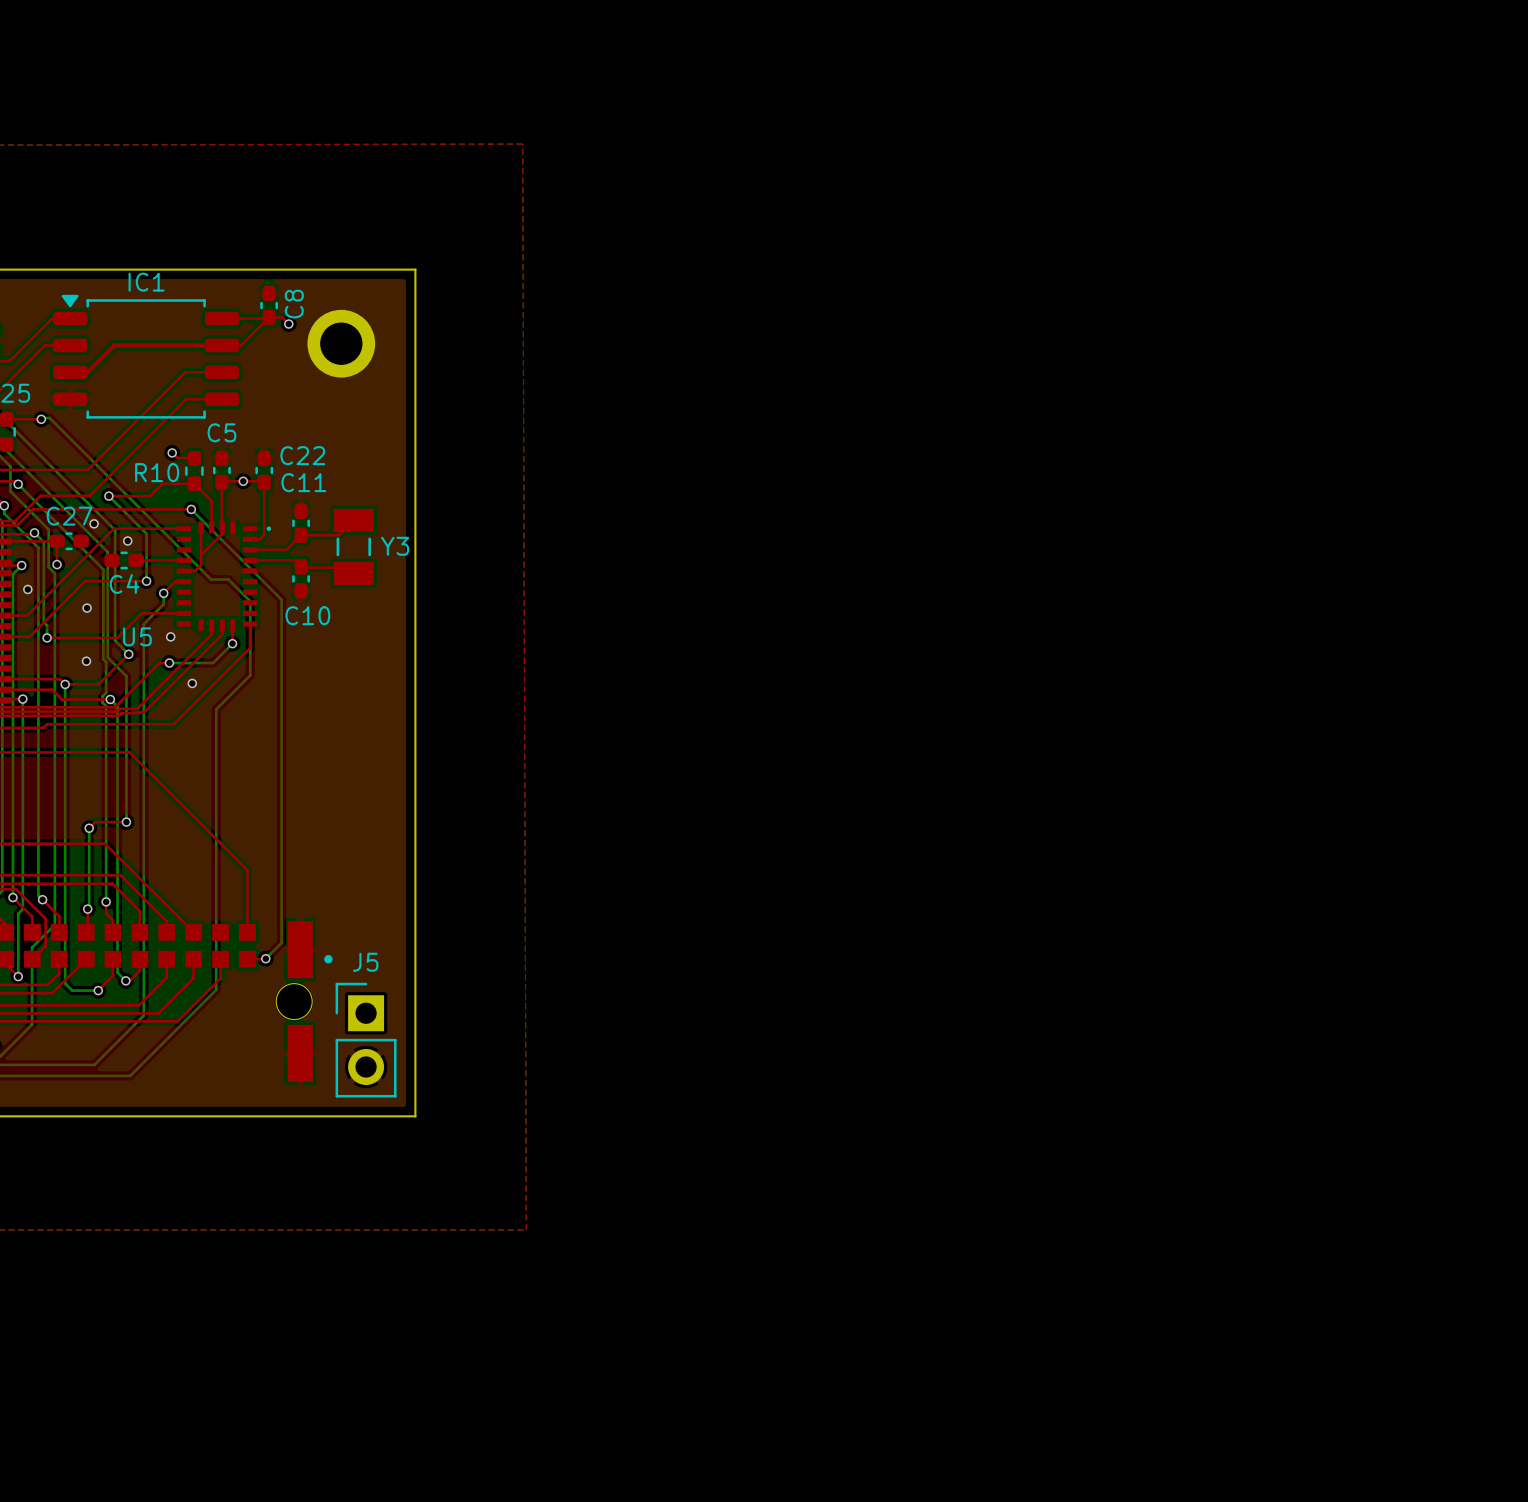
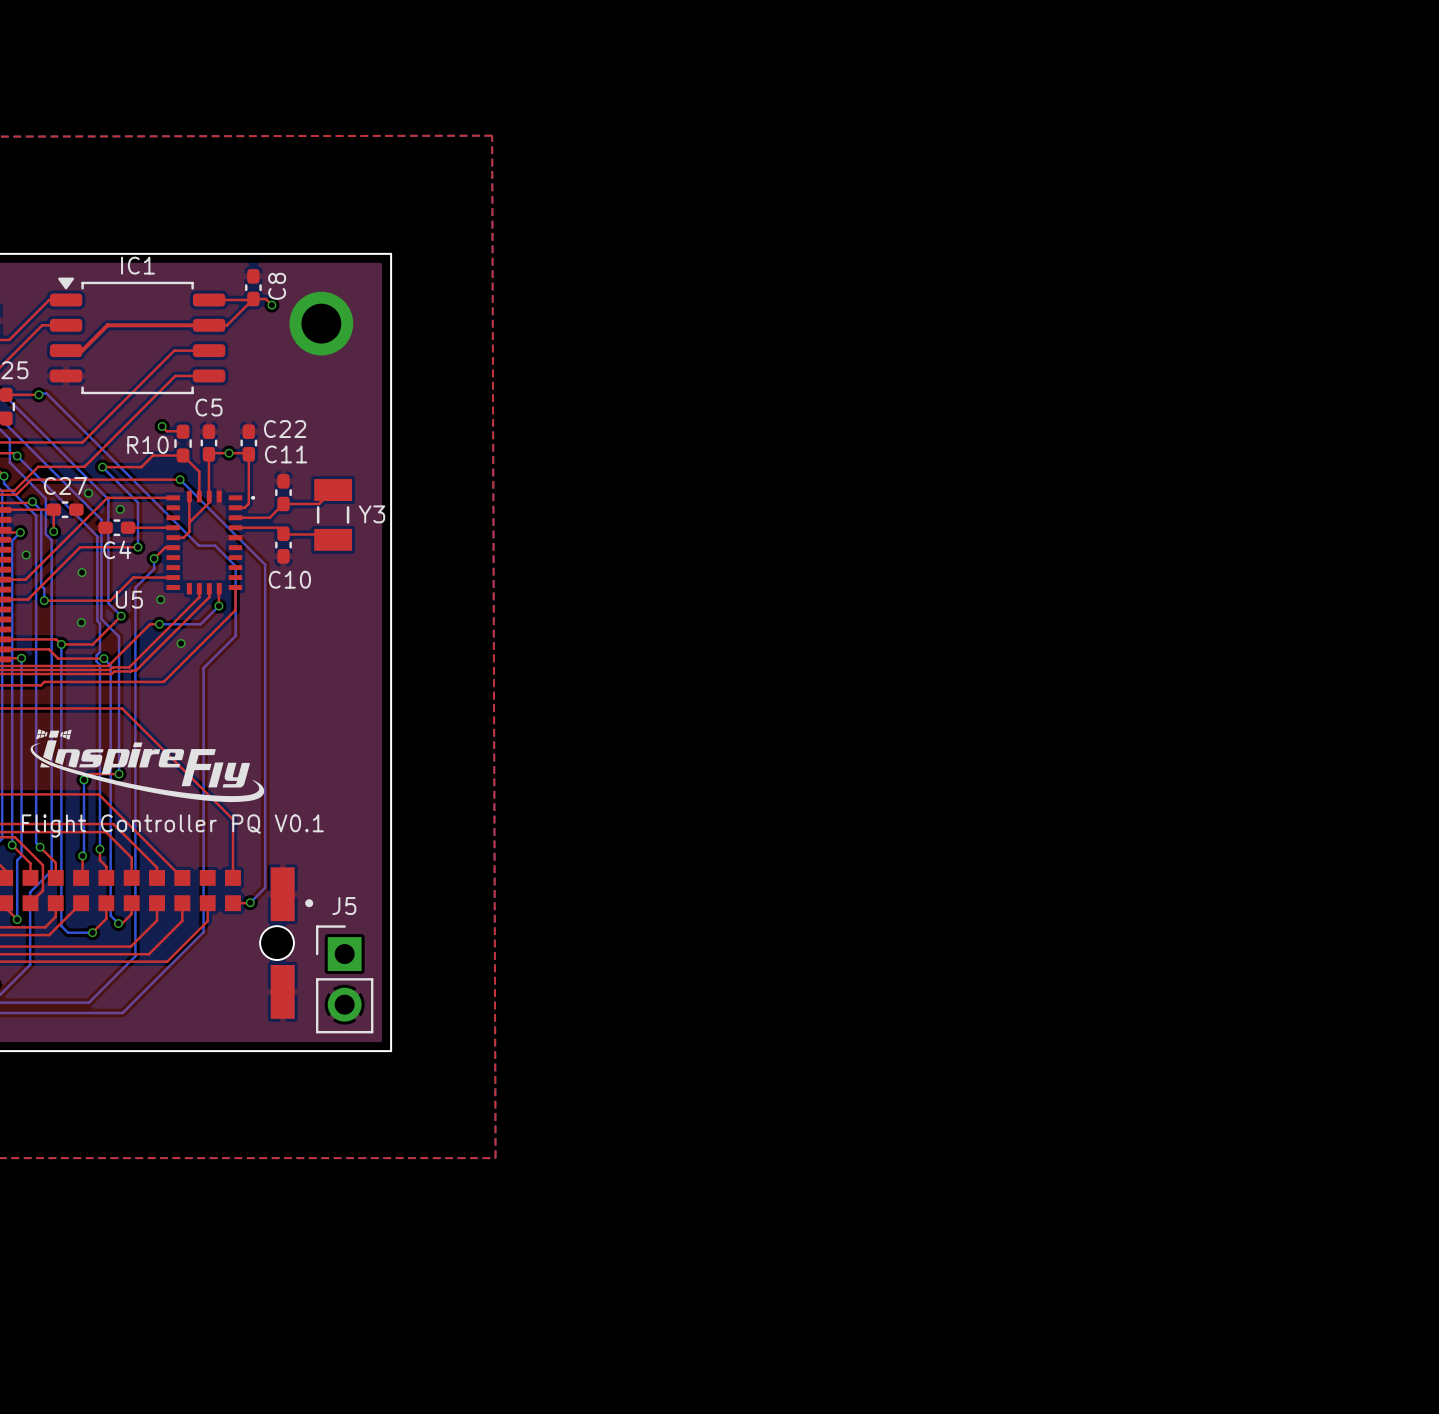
drawing: none -> [30, 729, 265, 803]
text: none -> Flight Controller PQ V0.1 (172, 825)

